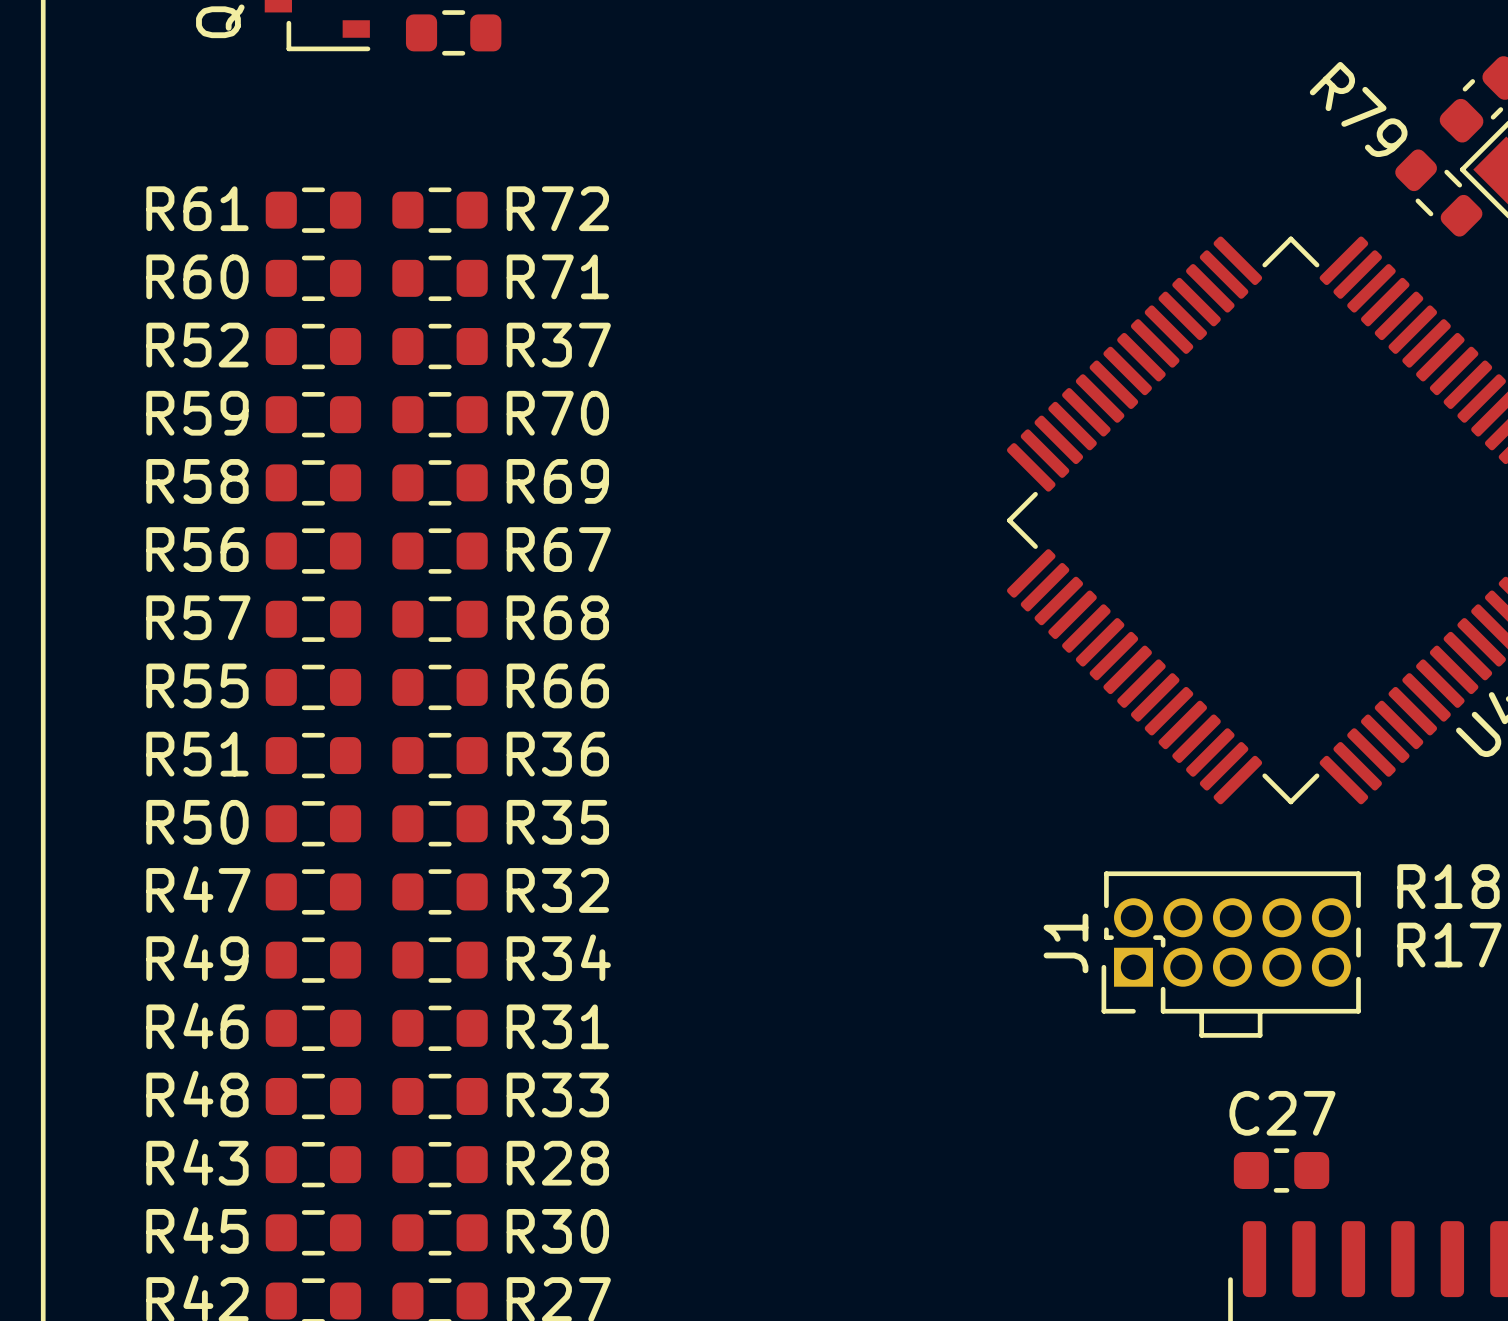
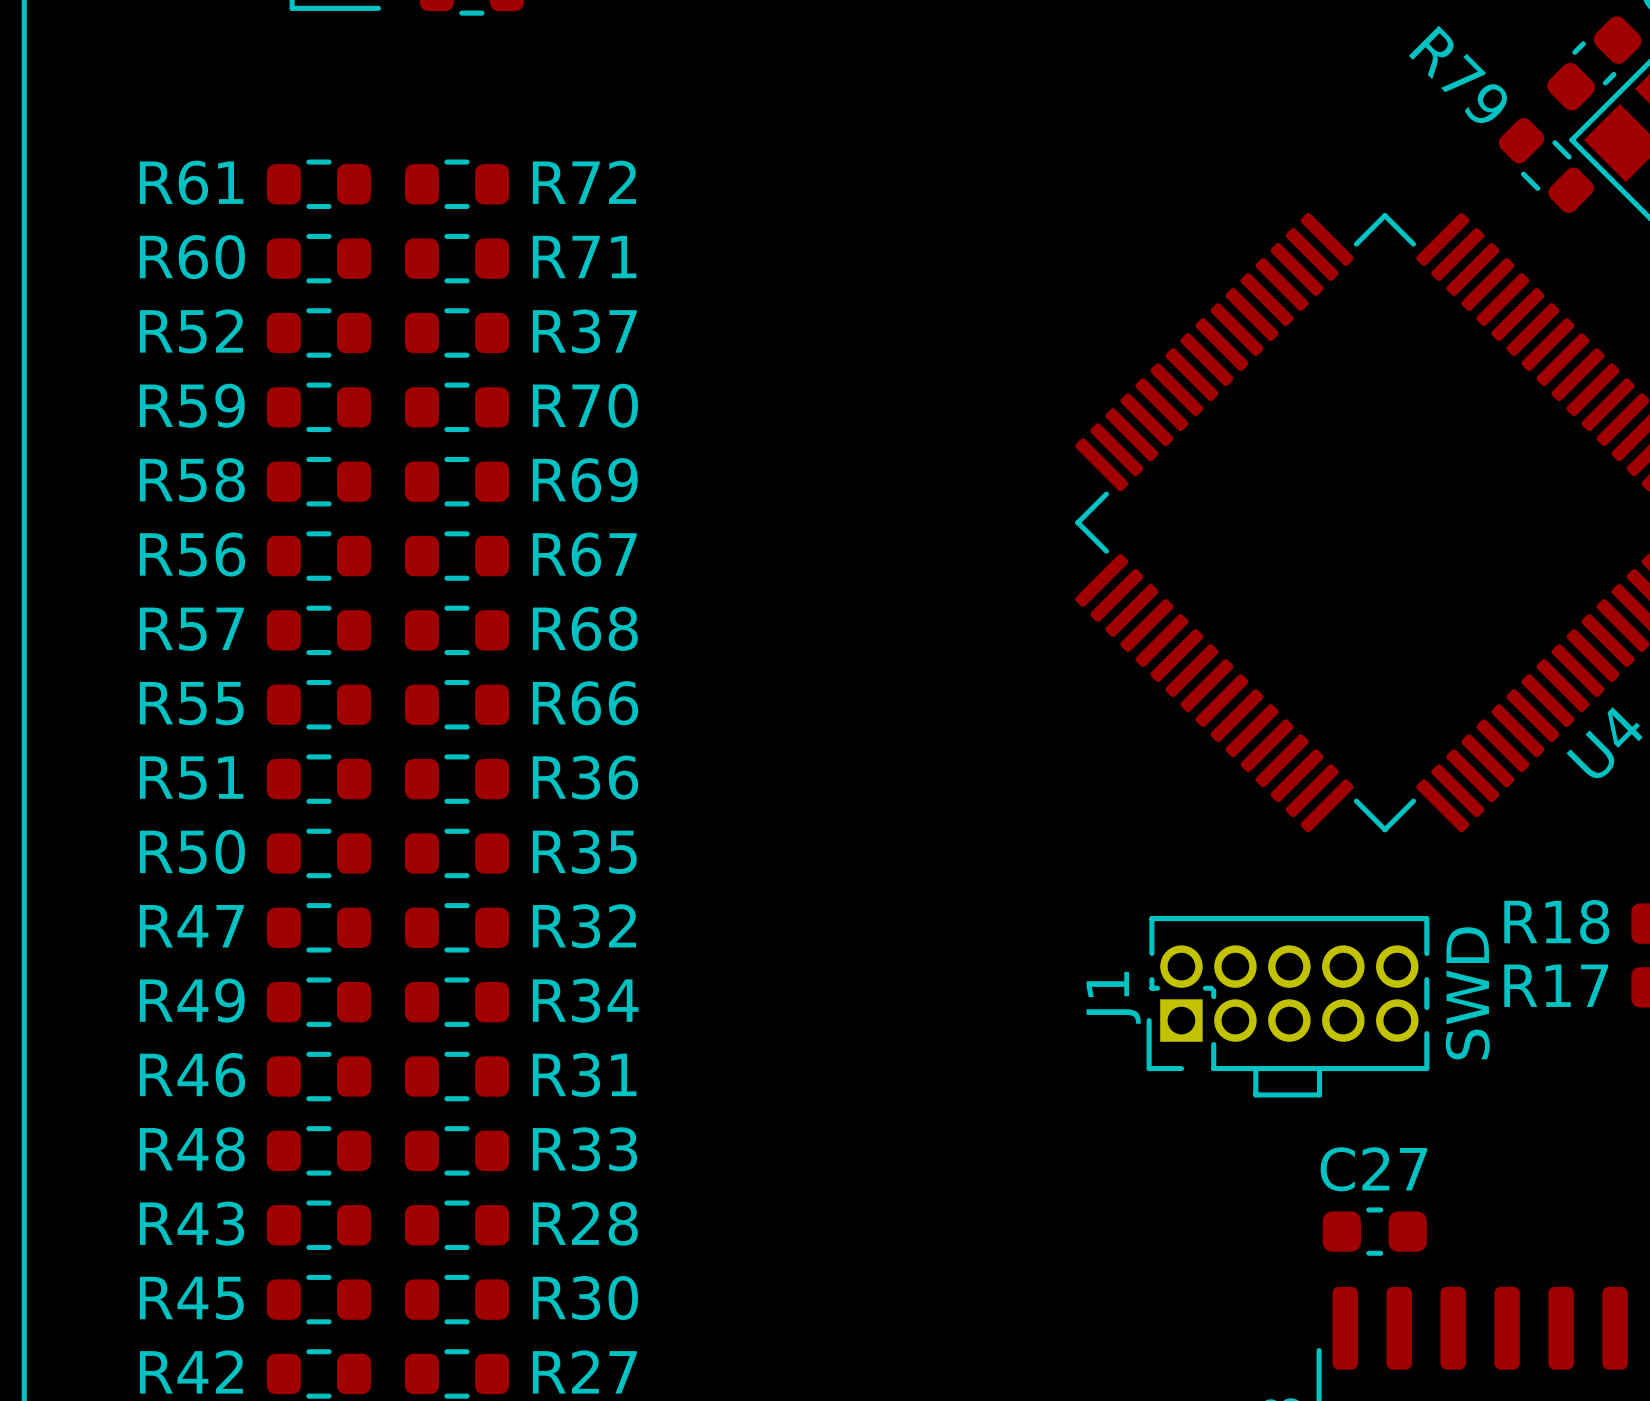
J1 value: none -> SWD (1467, 993)
J1 position: (1231, 954) -> (1287, 1006)

